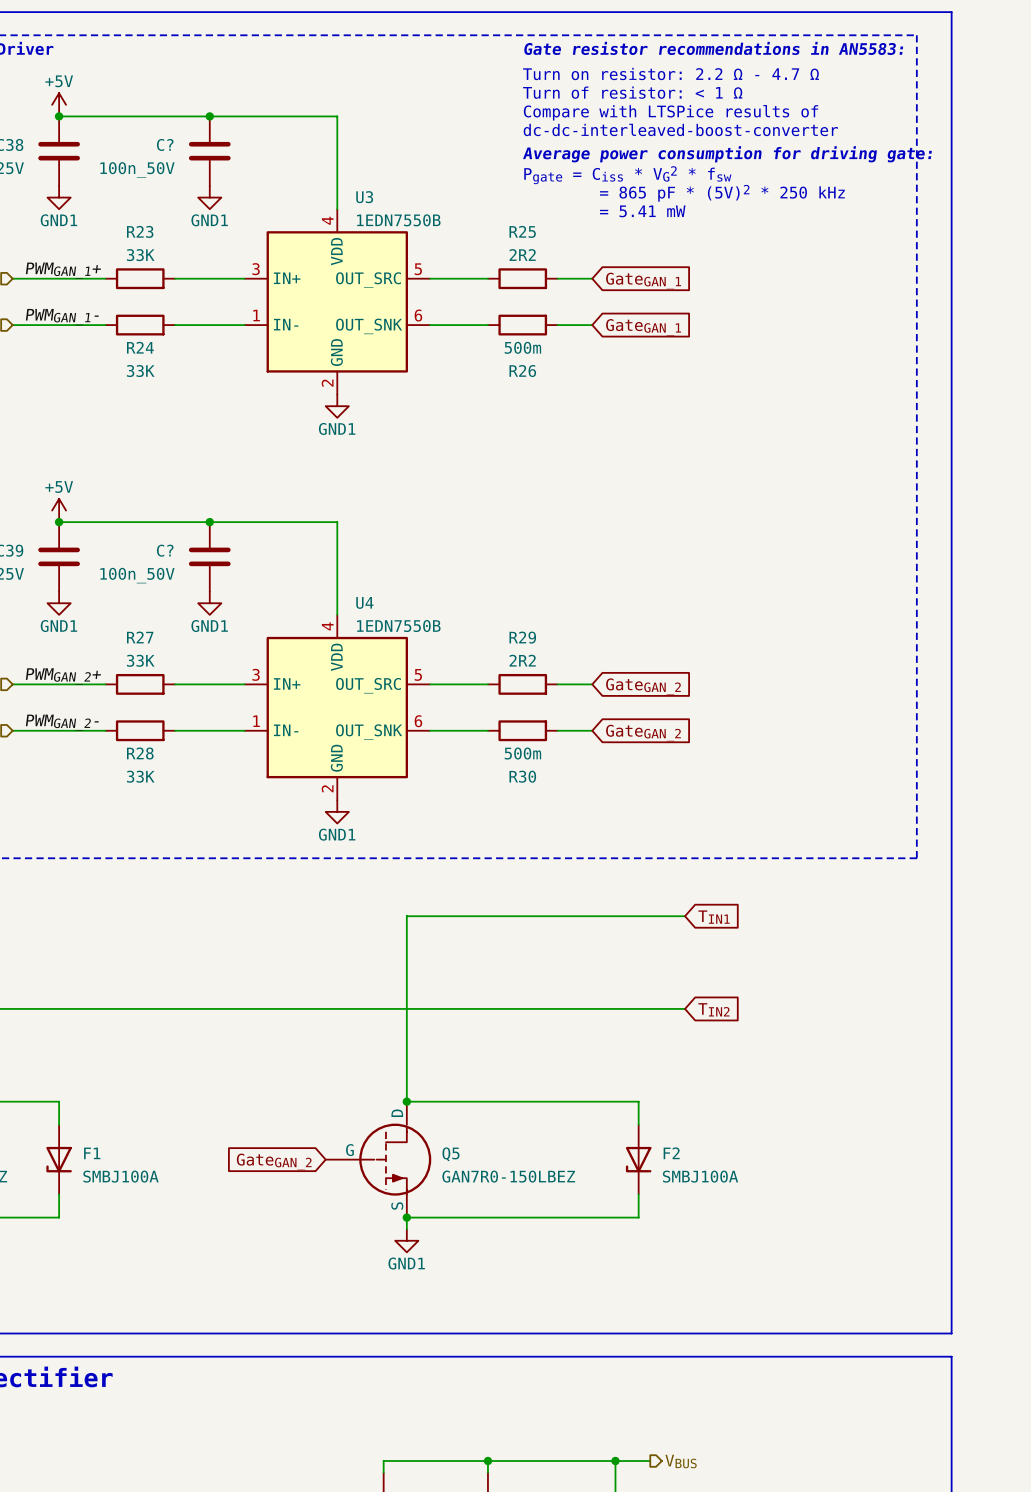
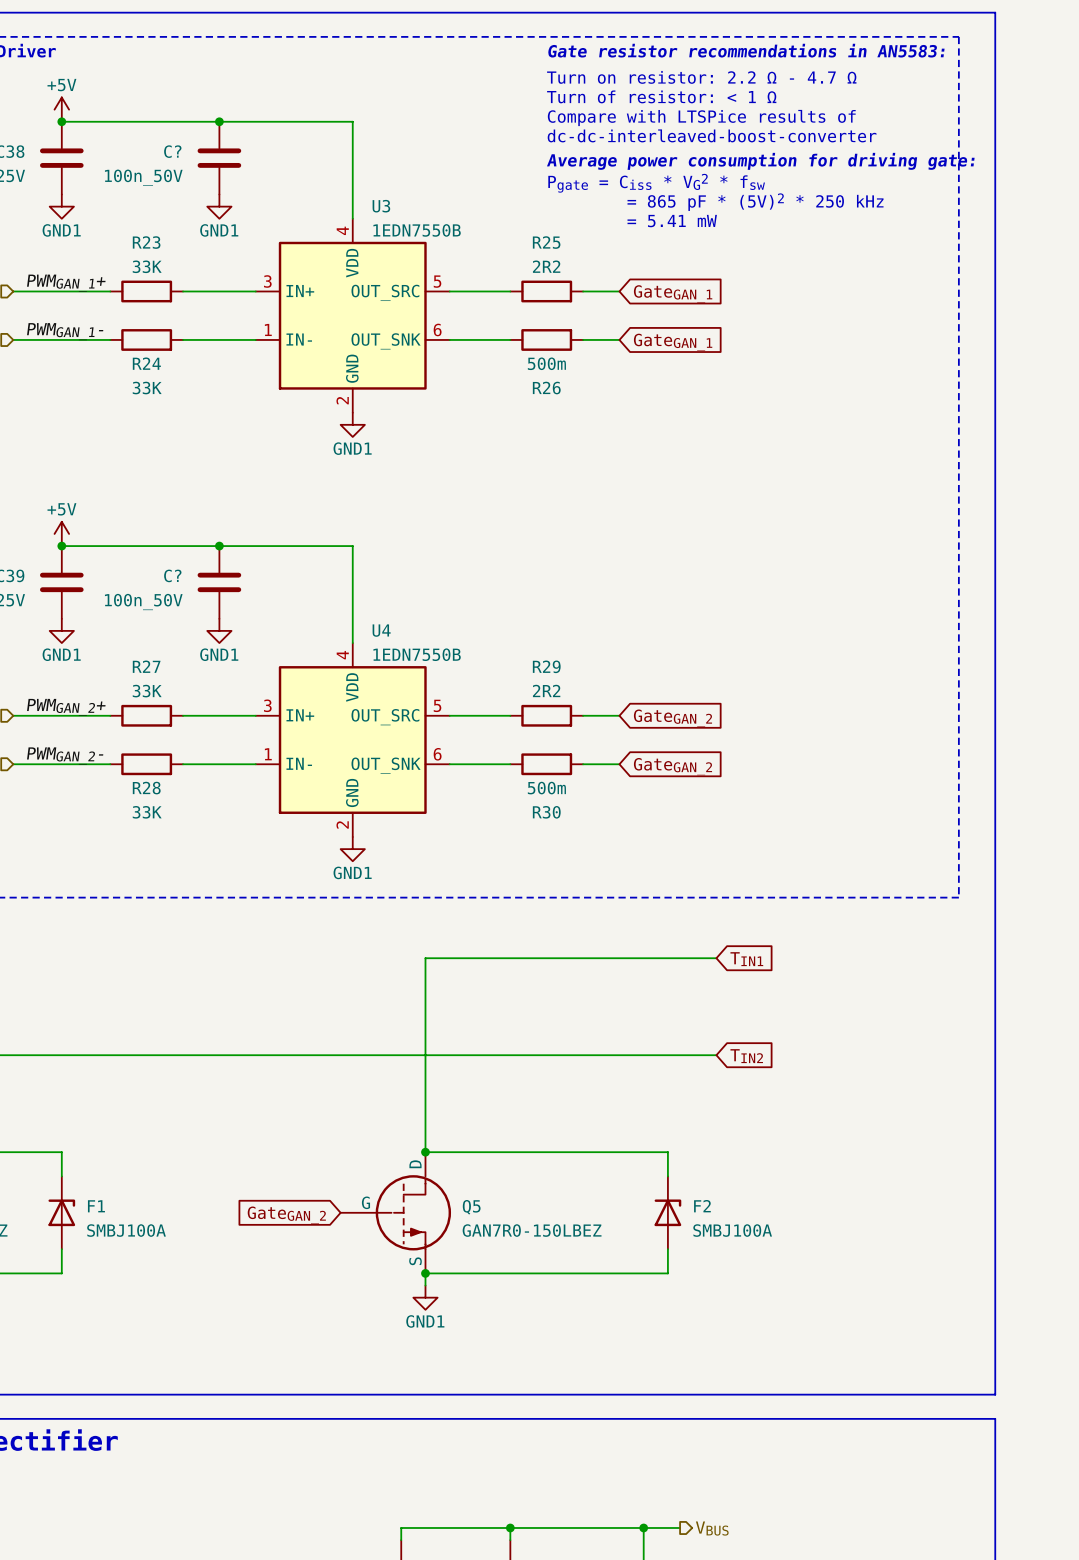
F1 rotation: 0° (59, 1159) -> 180° (61, 1212)
F2 rotation: 0° (638, 1159) -> 180° (667, 1212)

